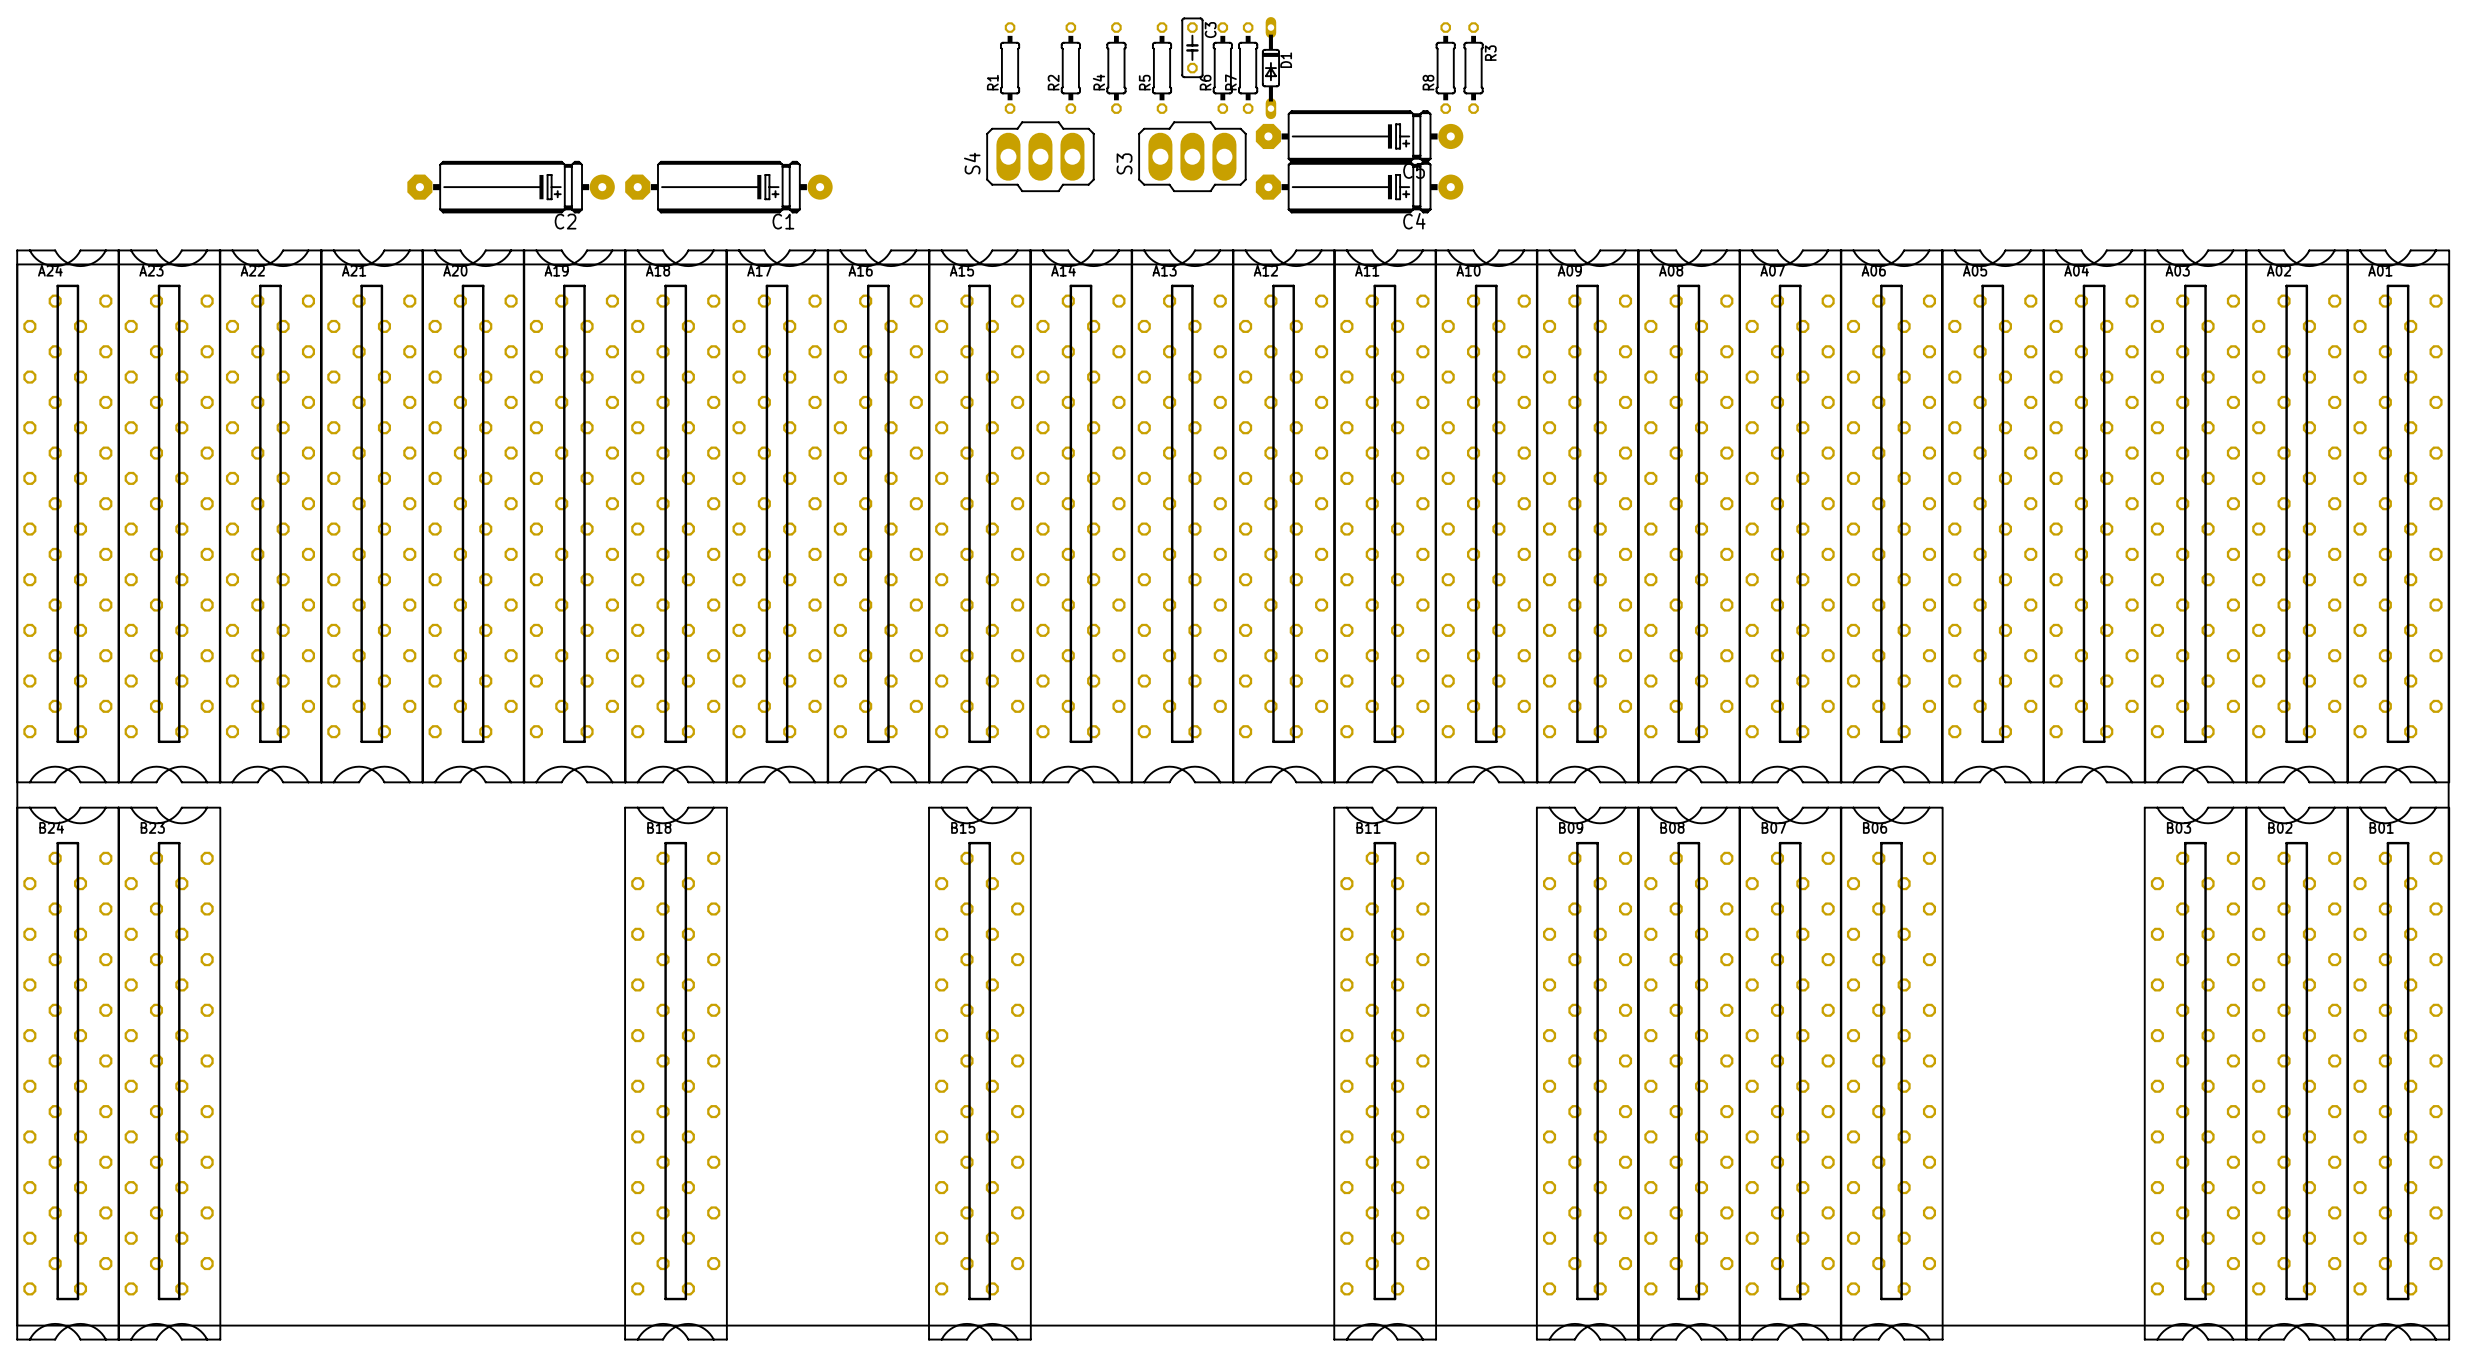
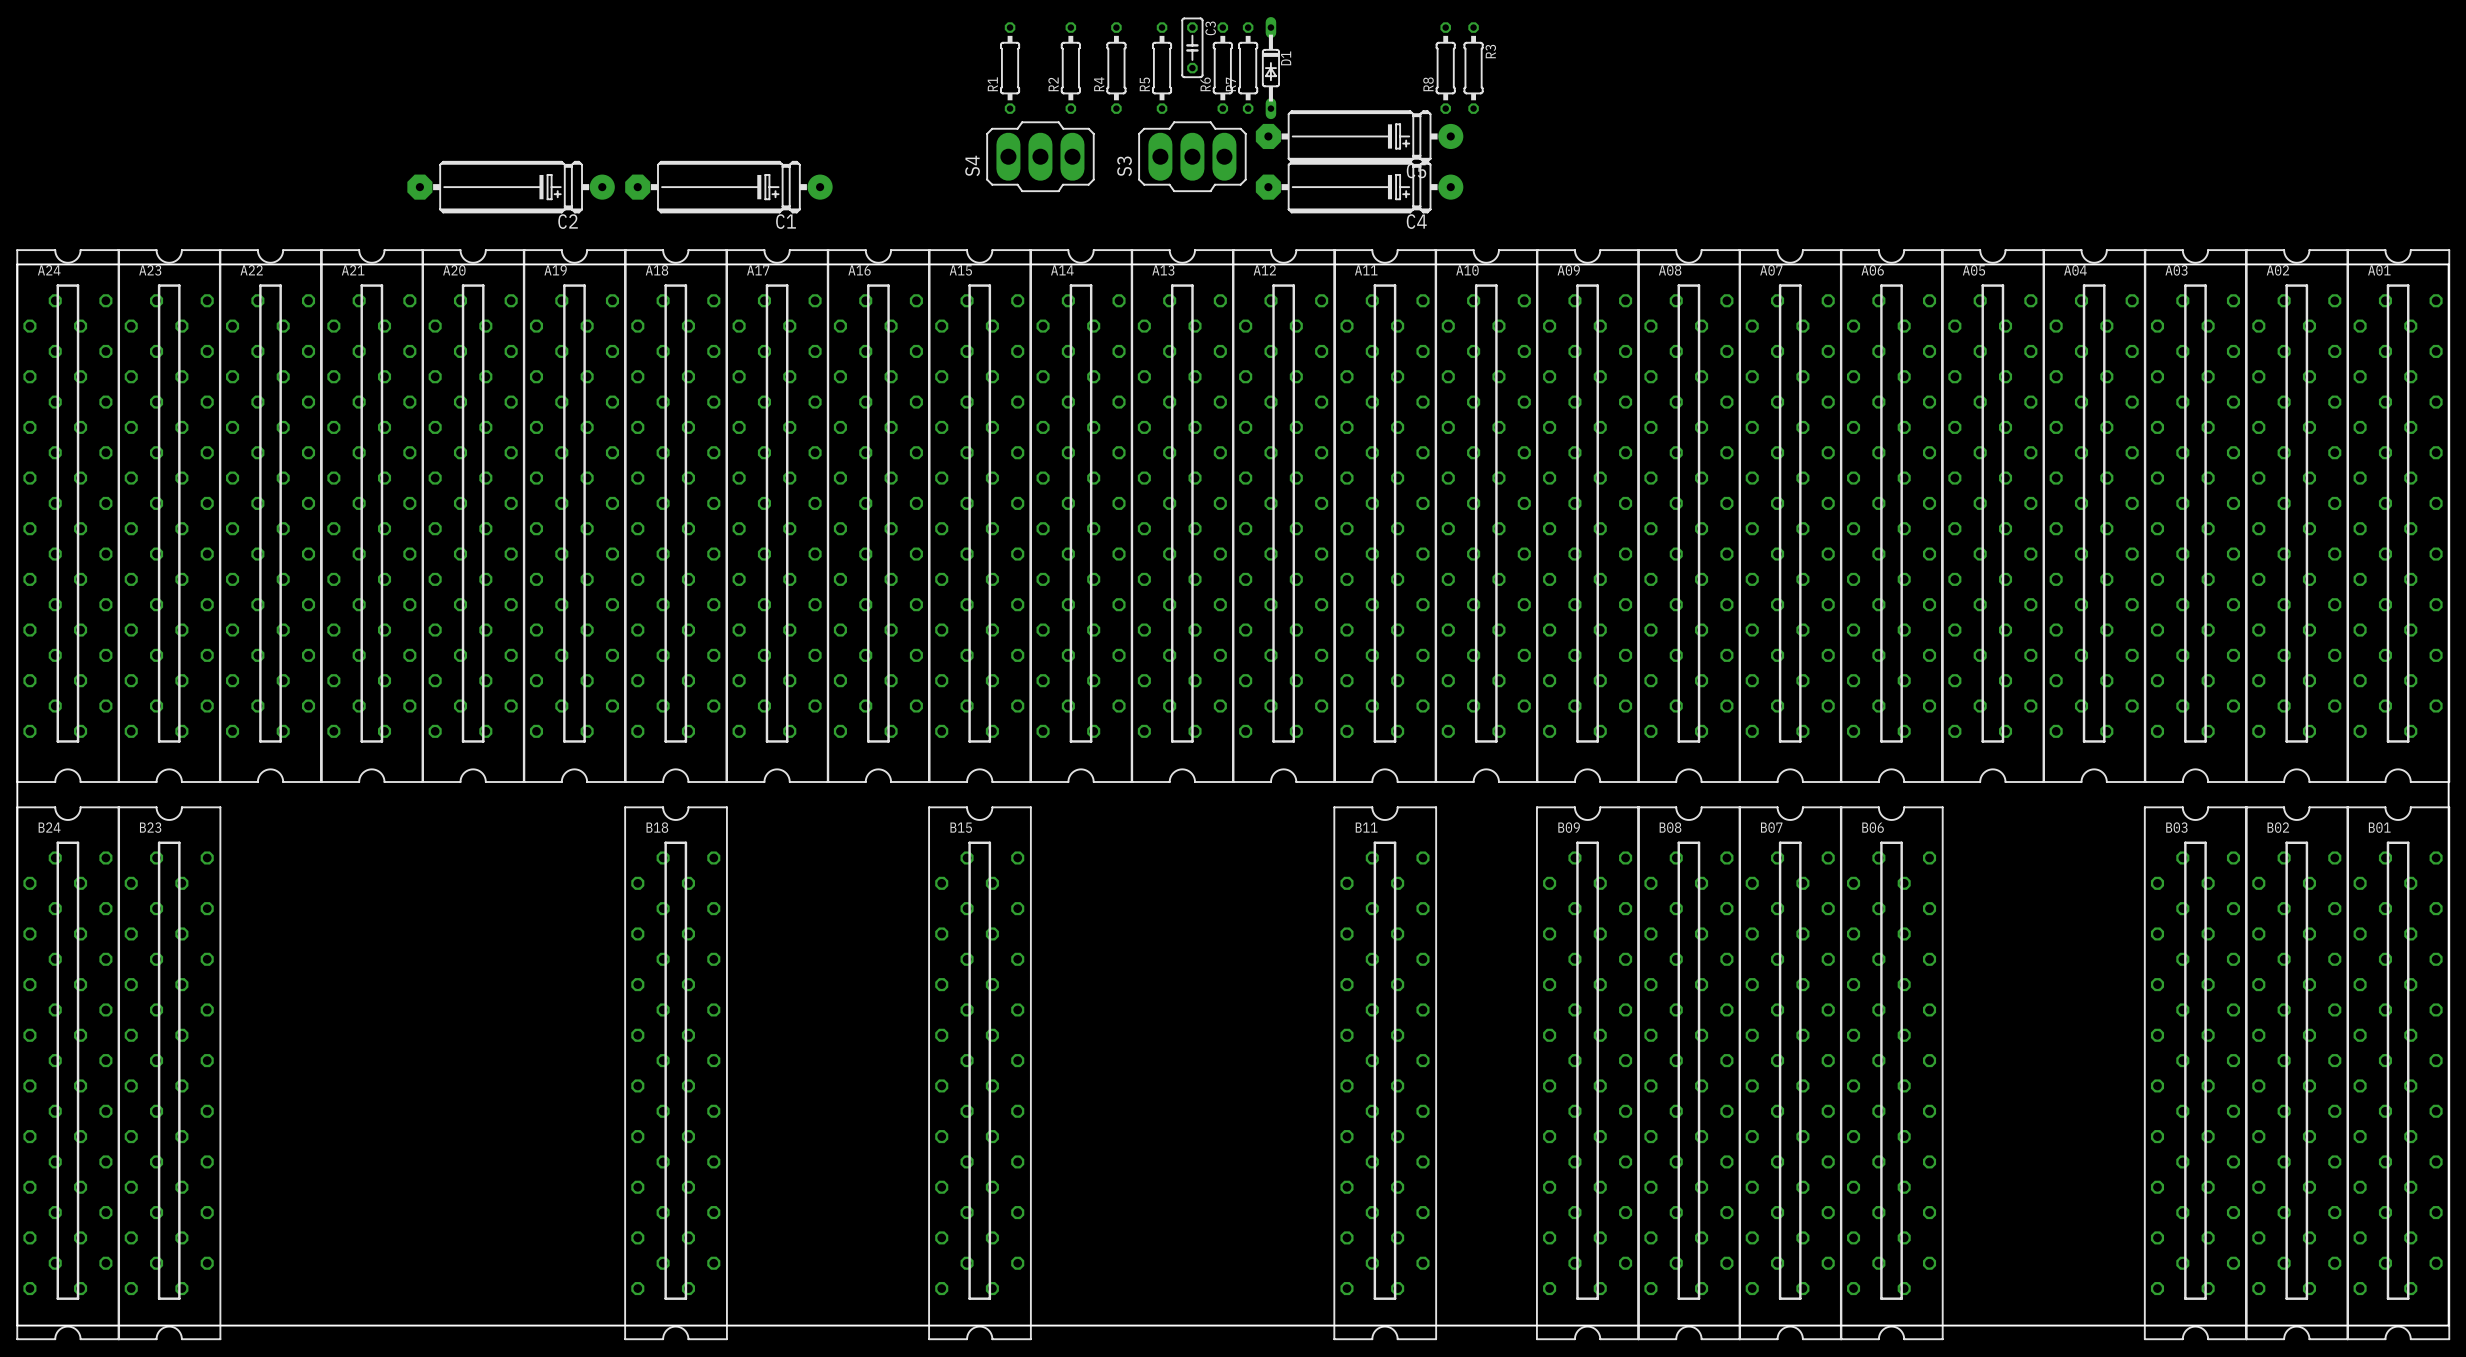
A24 footprint: [16, 249, 120, 783] -> [16, 249, 120, 783]
A23 footprint: [117, 249, 221, 783] -> [118, 249, 221, 783]
A22 footprint: [219, 249, 323, 783] -> [219, 249, 323, 783]
A21 footprint: [320, 249, 424, 783] -> [320, 249, 424, 783]
A20 footprint: [421, 249, 525, 783] -> [422, 249, 525, 783]
A19 footprint: [523, 249, 627, 783] -> [523, 249, 627, 783]
A18 footprint: [624, 249, 728, 783] -> [624, 249, 728, 783]
A17 footprint: [725, 249, 829, 783] -> [725, 249, 829, 783]
A16 footprint: [827, 249, 931, 783] -> [827, 249, 931, 783]
A15 footprint: [928, 249, 1032, 783] -> [928, 249, 1032, 783]
A14 footprint: [1029, 249, 1133, 783] -> [1029, 249, 1133, 783]
A13 footprint: [1131, 249, 1234, 783] -> [1131, 249, 1235, 783]
A12 footprint: [1232, 249, 1336, 783] -> [1232, 249, 1336, 783]
A11 footprint: [1333, 249, 1437, 783] -> [1333, 249, 1437, 783]
A10 footprint: [1435, 249, 1538, 783] -> [1435, 249, 1538, 783]
A09 footprint: [1536, 249, 1640, 783] -> [1536, 249, 1640, 783]
A08 footprint: [1637, 249, 1741, 783] -> [1637, 249, 1741, 783]
A07 footprint: [1739, 249, 1842, 783] -> [1739, 249, 1842, 783]
A06 footprint: [1840, 249, 1944, 783] -> [1840, 249, 1944, 783]
A05 footprint: [1941, 249, 2045, 783] -> [1941, 249, 2045, 783]
A04 footprint: [2042, 249, 2146, 783] -> [2043, 249, 2146, 783]
A03 footprint: [2144, 249, 2248, 783] -> [2144, 249, 2248, 783]
A02 footprint: [2245, 249, 2349, 783] -> [2245, 249, 2349, 783]
A01 footprint: [2346, 249, 2450, 783] -> [2346, 249, 2450, 783]
B24 footprint: [16, 807, 120, 1341] -> [16, 806, 120, 1340]
B23 footprint: [117, 807, 221, 1341] -> [118, 806, 221, 1340]
B18 footprint: [624, 807, 728, 1341] -> [624, 806, 728, 1340]
B15 footprint: [928, 807, 1032, 1341] -> [928, 806, 1032, 1340]
B11 footprint: [1333, 807, 1437, 1341] -> [1333, 806, 1437, 1340]
B09 footprint: [1536, 807, 1640, 1341] -> [1536, 806, 1640, 1340]
B08 footprint: [1637, 807, 1741, 1341] -> [1637, 806, 1741, 1340]
B07 footprint: [1739, 807, 1842, 1341] -> [1739, 806, 1842, 1340]
B06 footprint: [1840, 807, 1944, 1341] -> [1840, 806, 1944, 1340]
B03 footprint: [2144, 807, 2248, 1341] -> [2144, 806, 2248, 1340]
B02 footprint: [2245, 807, 2349, 1341] -> [2245, 806, 2349, 1340]
B01 footprint: [2346, 807, 2450, 1341] -> [2346, 806, 2450, 1340]

